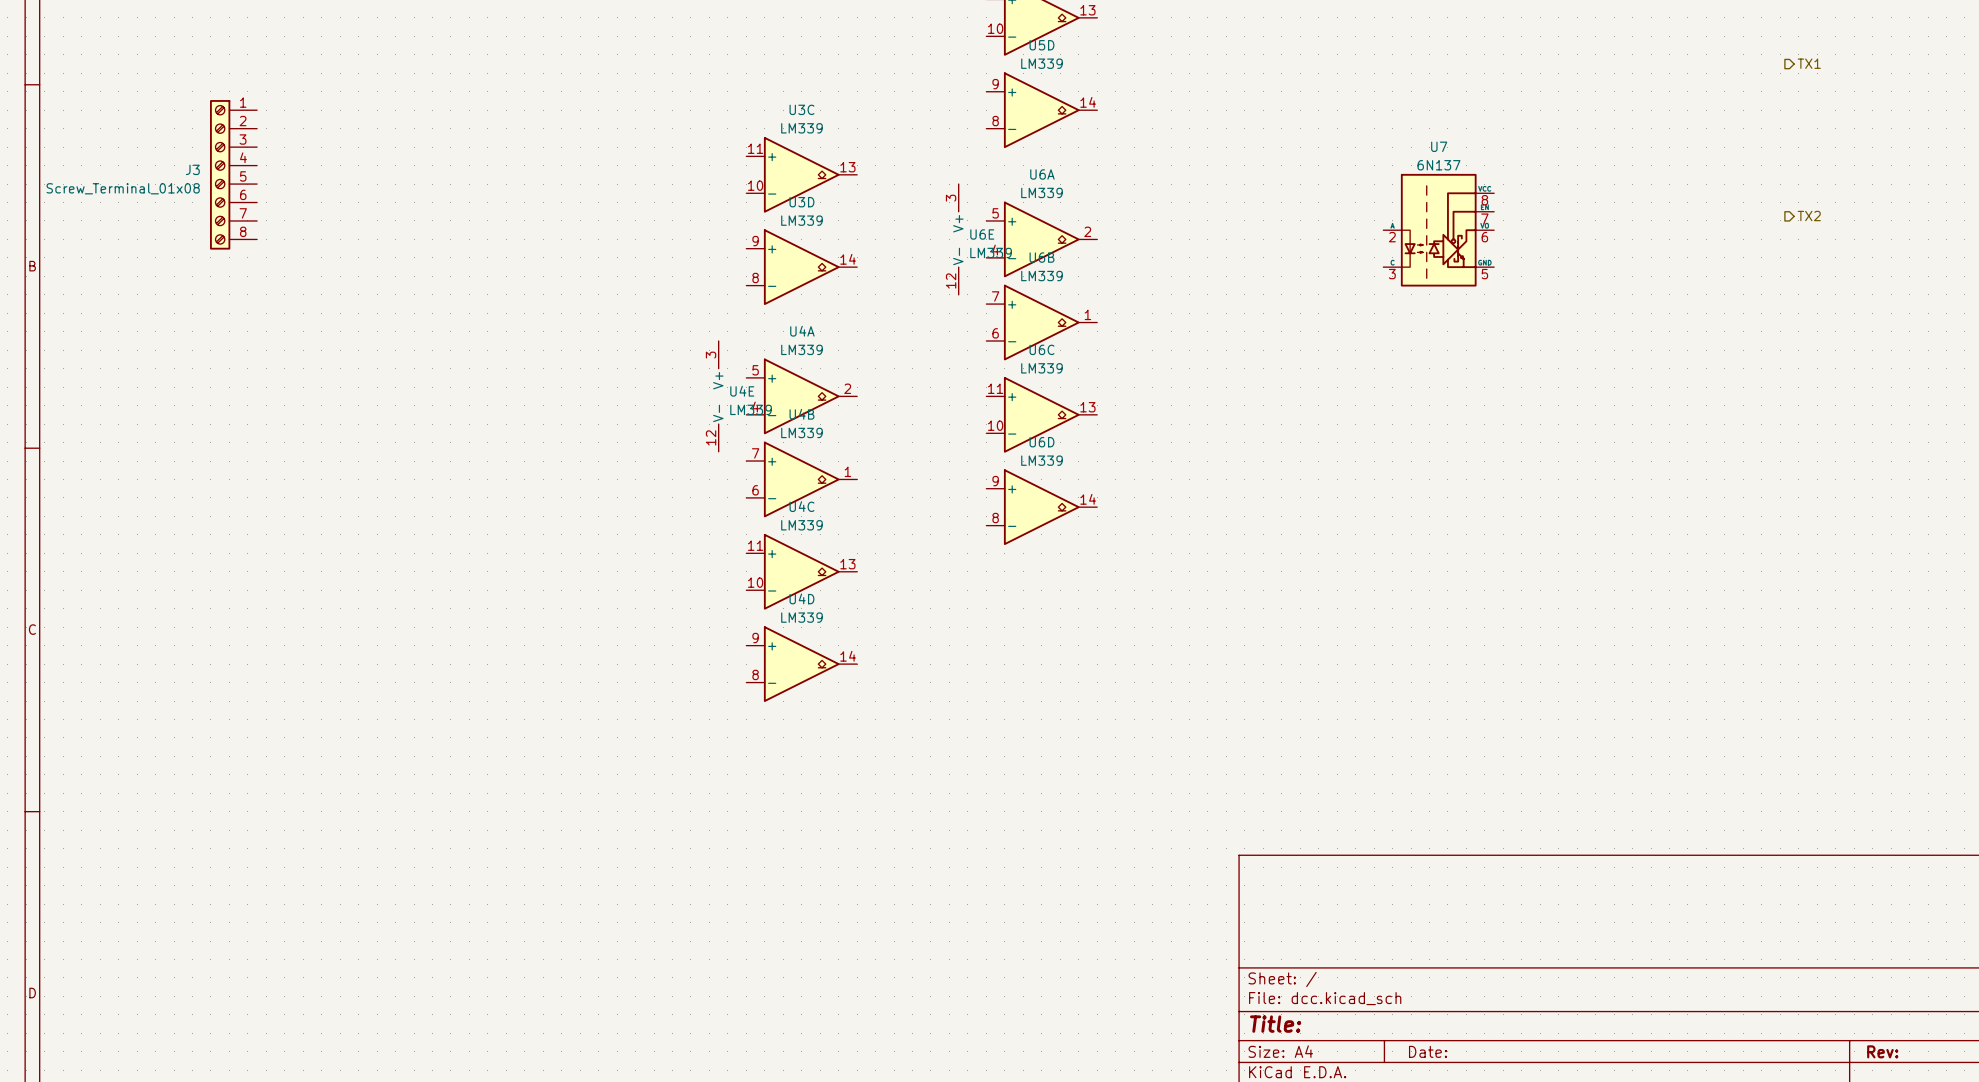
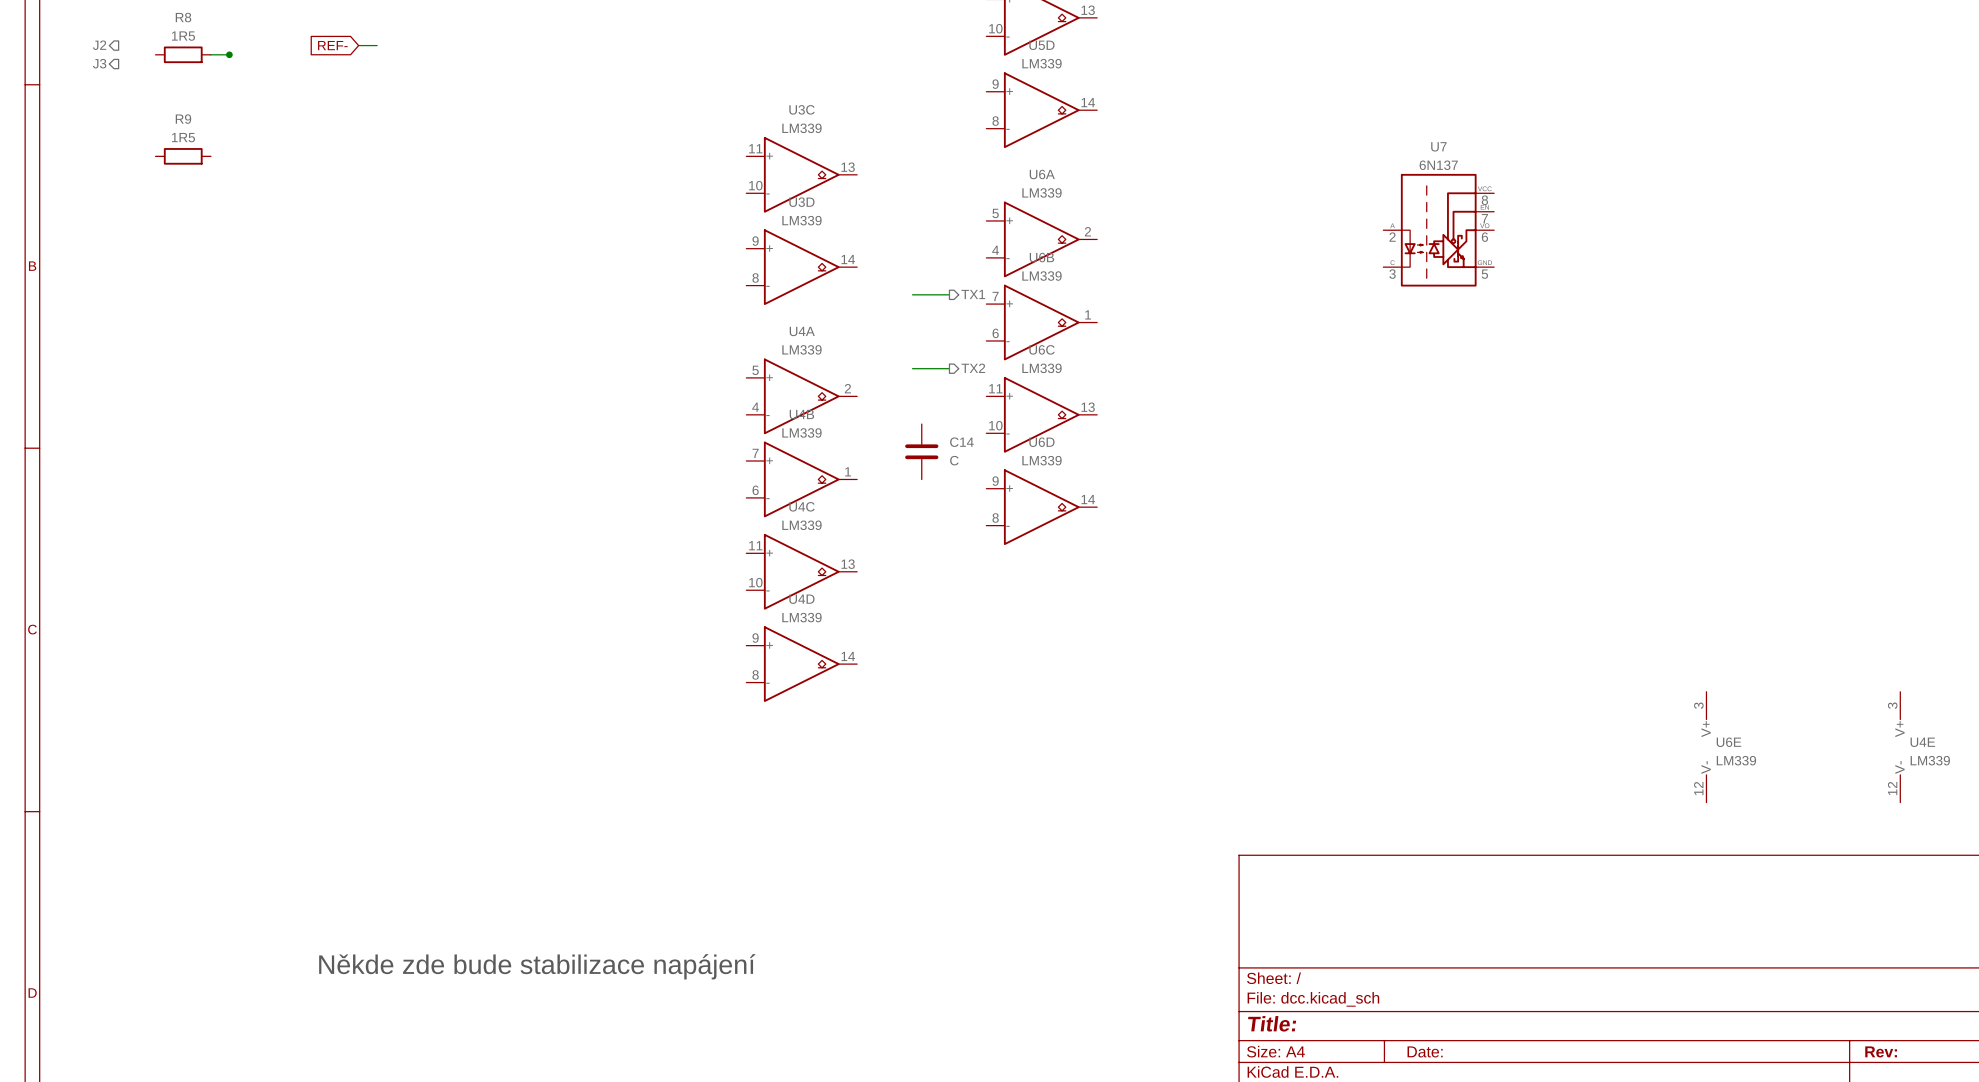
hierarchical label: none -> J2 (99, 45)
global label: none -> REF- (332, 45)
wire: none -> (358, 45) (377, 45)
R8: none -> 1R5 (183, 54)
wire: none -> (210, 54) (229, 54)
junction: none -> (229, 54)
hierarchical label: none -> J3 (99, 63)
hierarchical label: TX1 (1809, 63) -> none
R9: none -> 1R5 (183, 156)
J3: Screw_Terminal_01x08 (233, 174) -> none
hierarchical label: TX2 (1809, 216) -> none
U6E position: (958, 239) -> (1706, 747)
wire: none -> (912, 294) (949, 294)
hierarchical label: none -> TX1 (973, 294)
wire: none -> (912, 368) (949, 368)
hierarchical label: none -> TX2 (973, 368)
U4E position: (718, 396) -> (1900, 747)
C14: none -> C (921, 451)
text: none -> Někde zde bude stabilizace napájení (537, 966)

